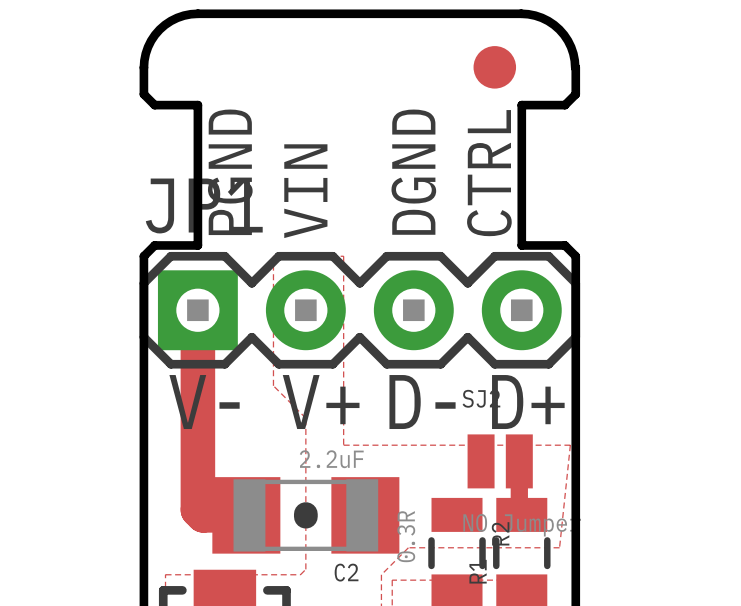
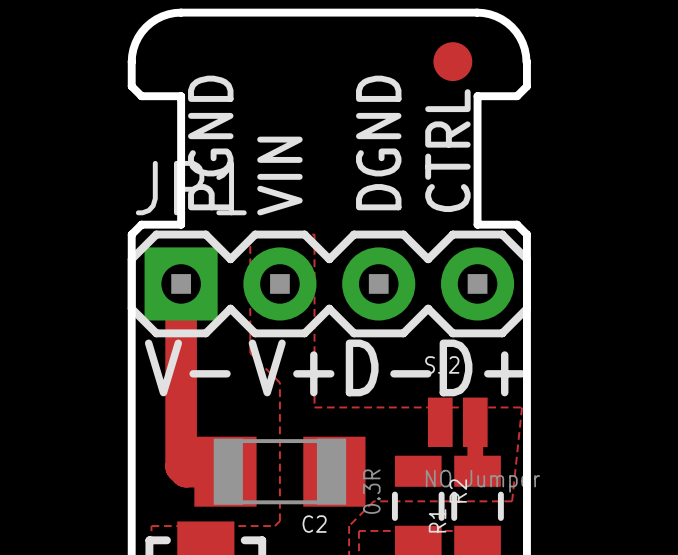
C2 value: 2.2uF (331, 459) -> none
C2 footprint: [212, 477, 400, 554] -> [194, 436, 366, 507]

